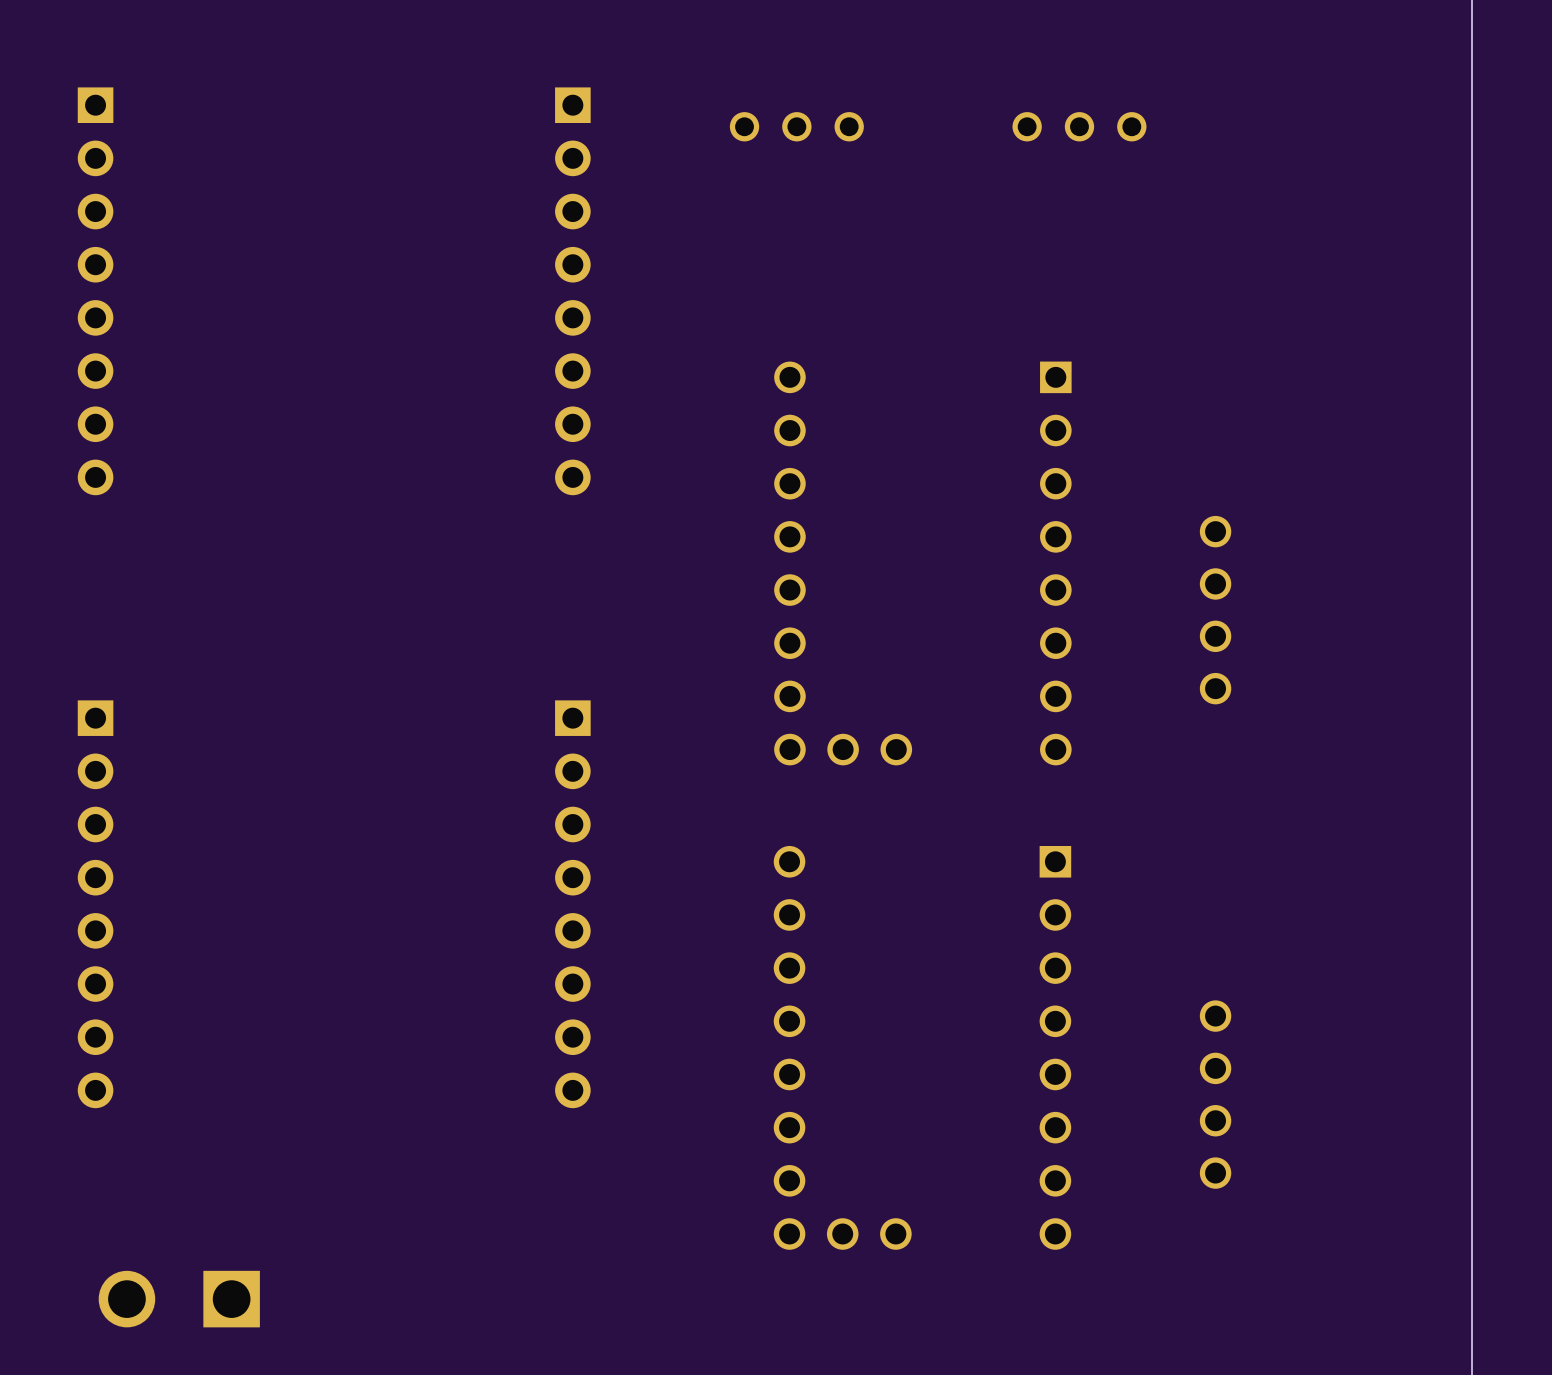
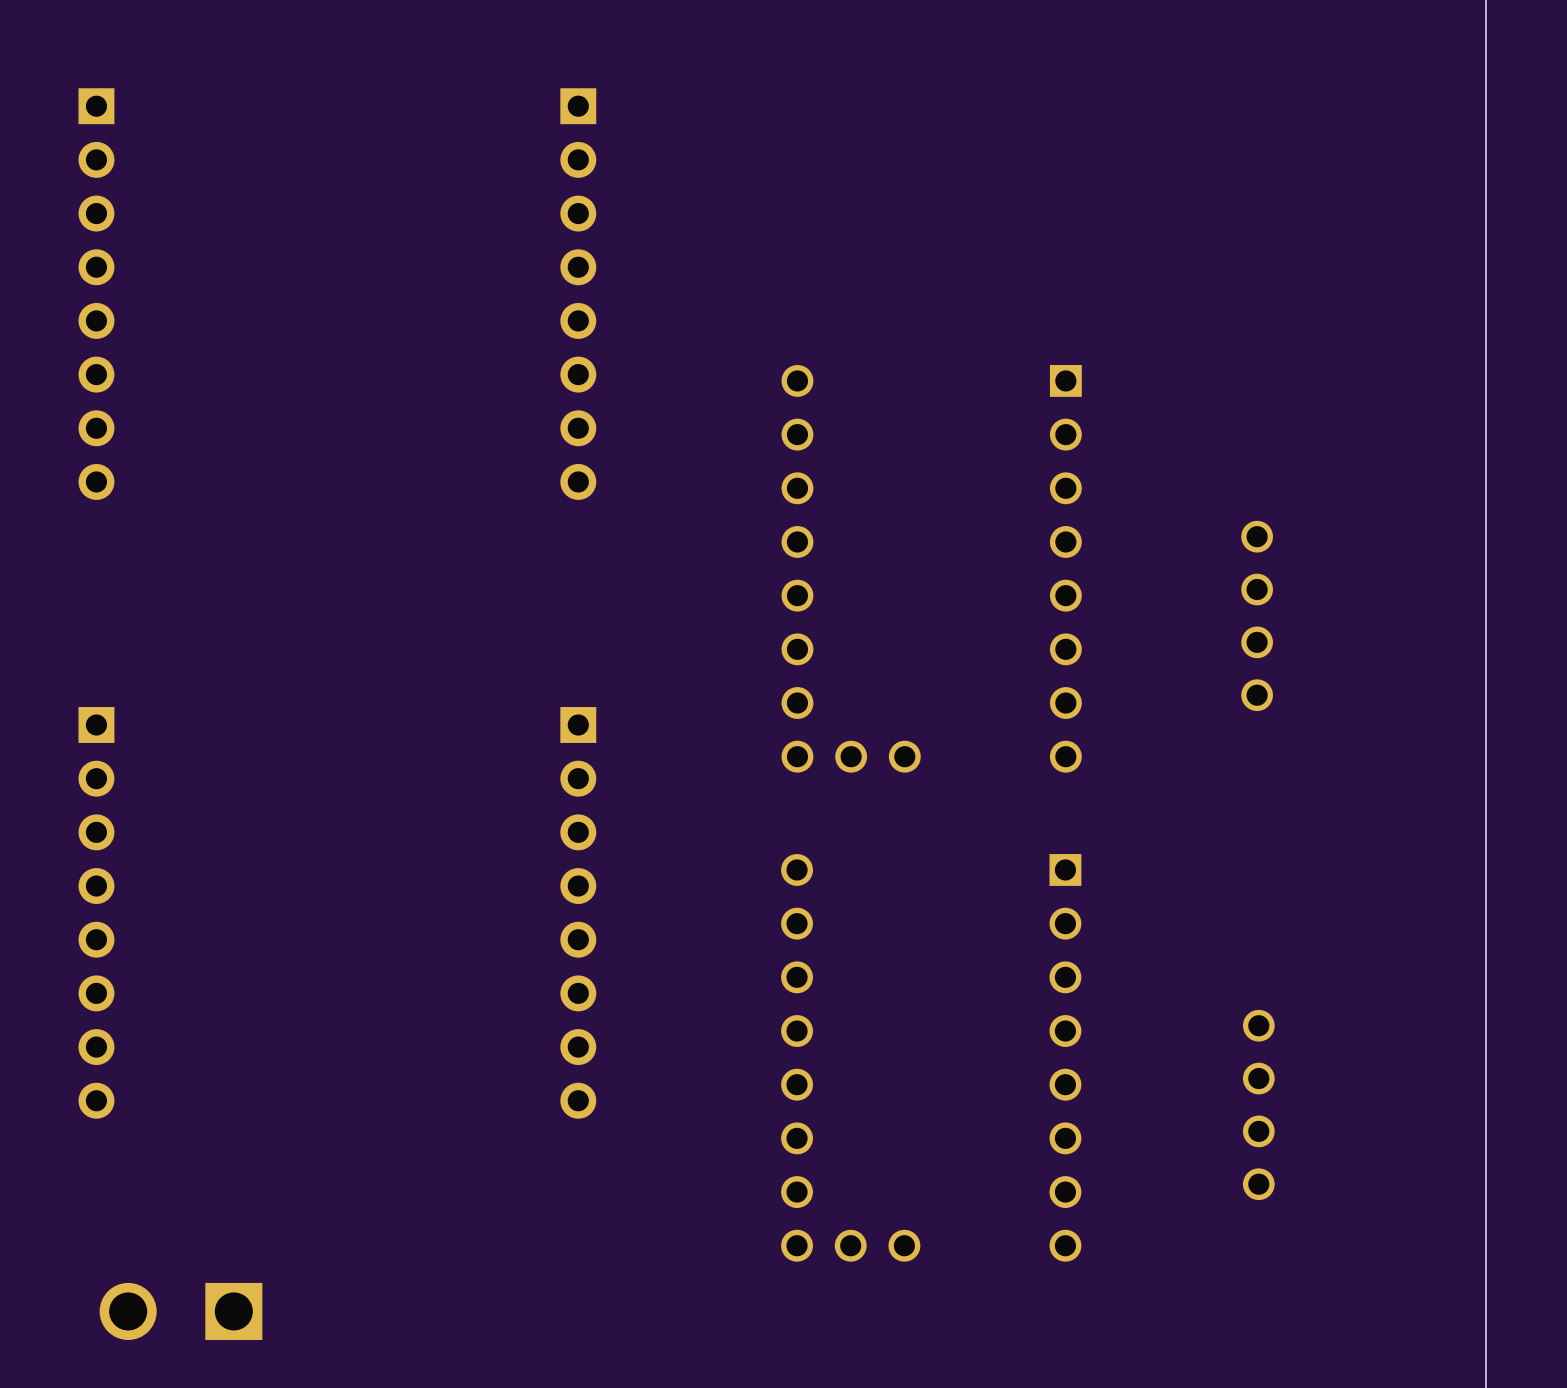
part: (796, 126) -> none
part: (1079, 126) -> none
part position: (1215, 610) -> (1257, 615)
part position: (1215, 1094) -> (1258, 1104)

